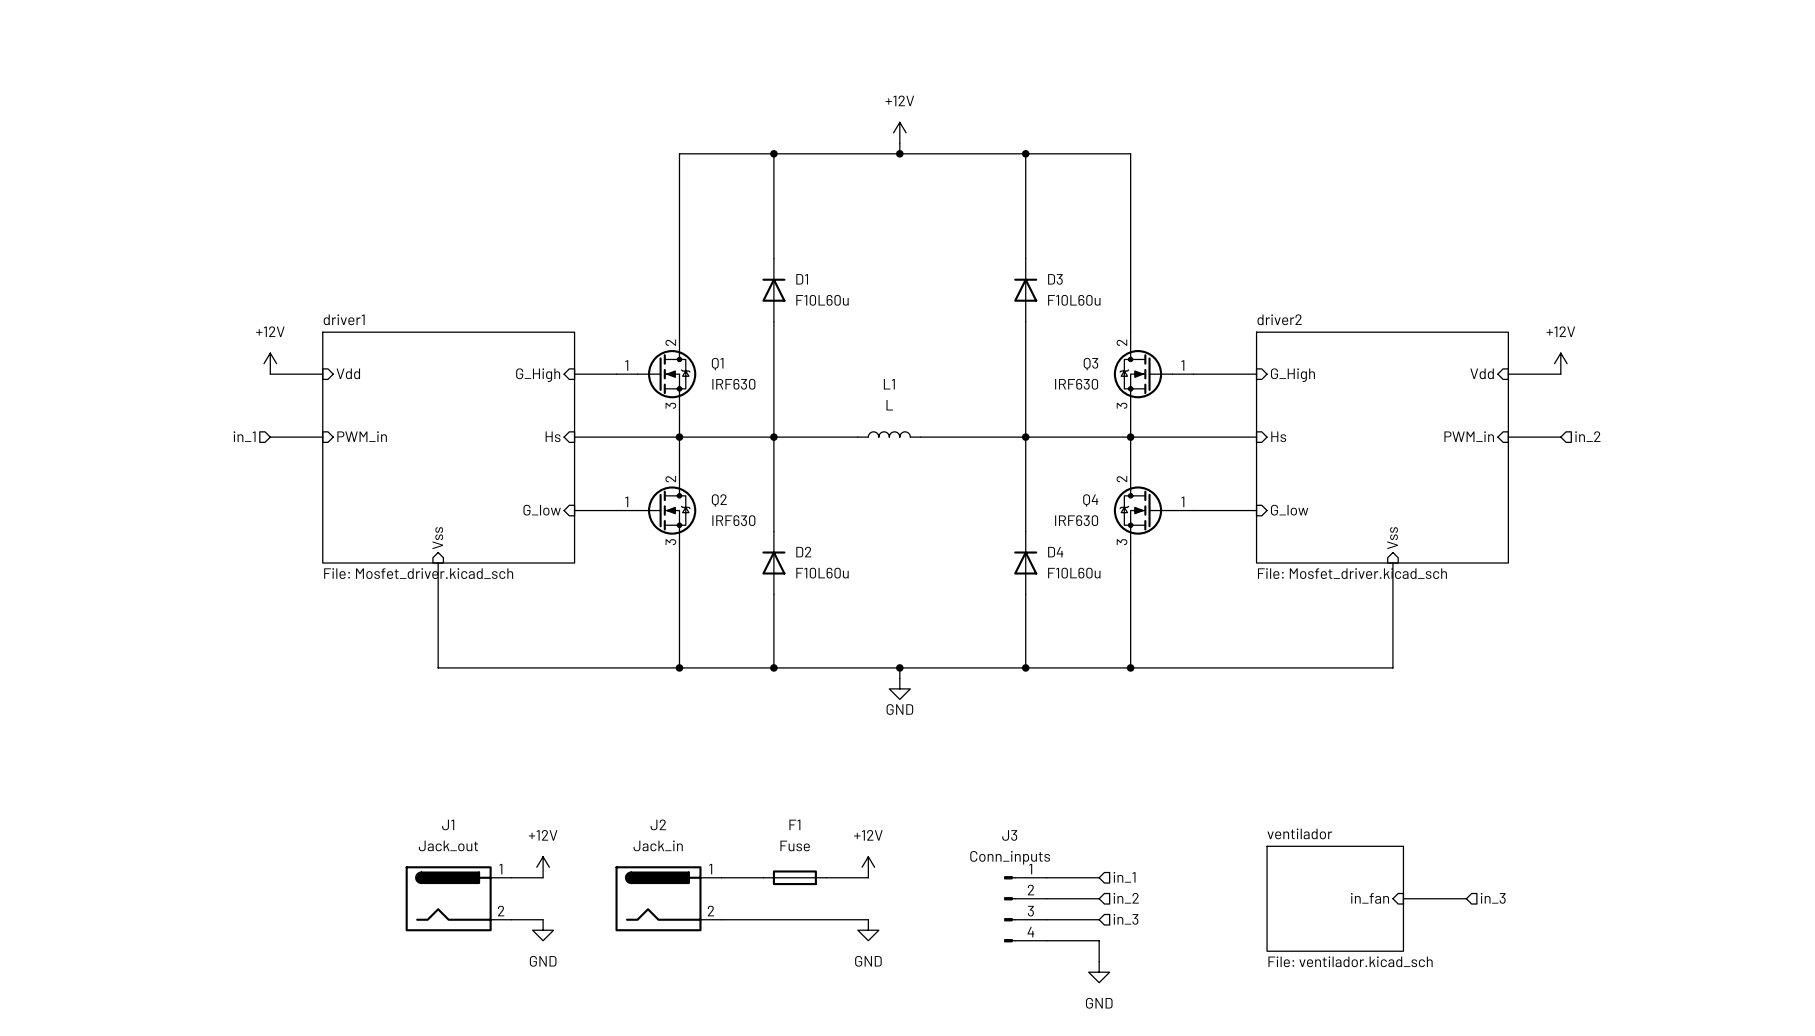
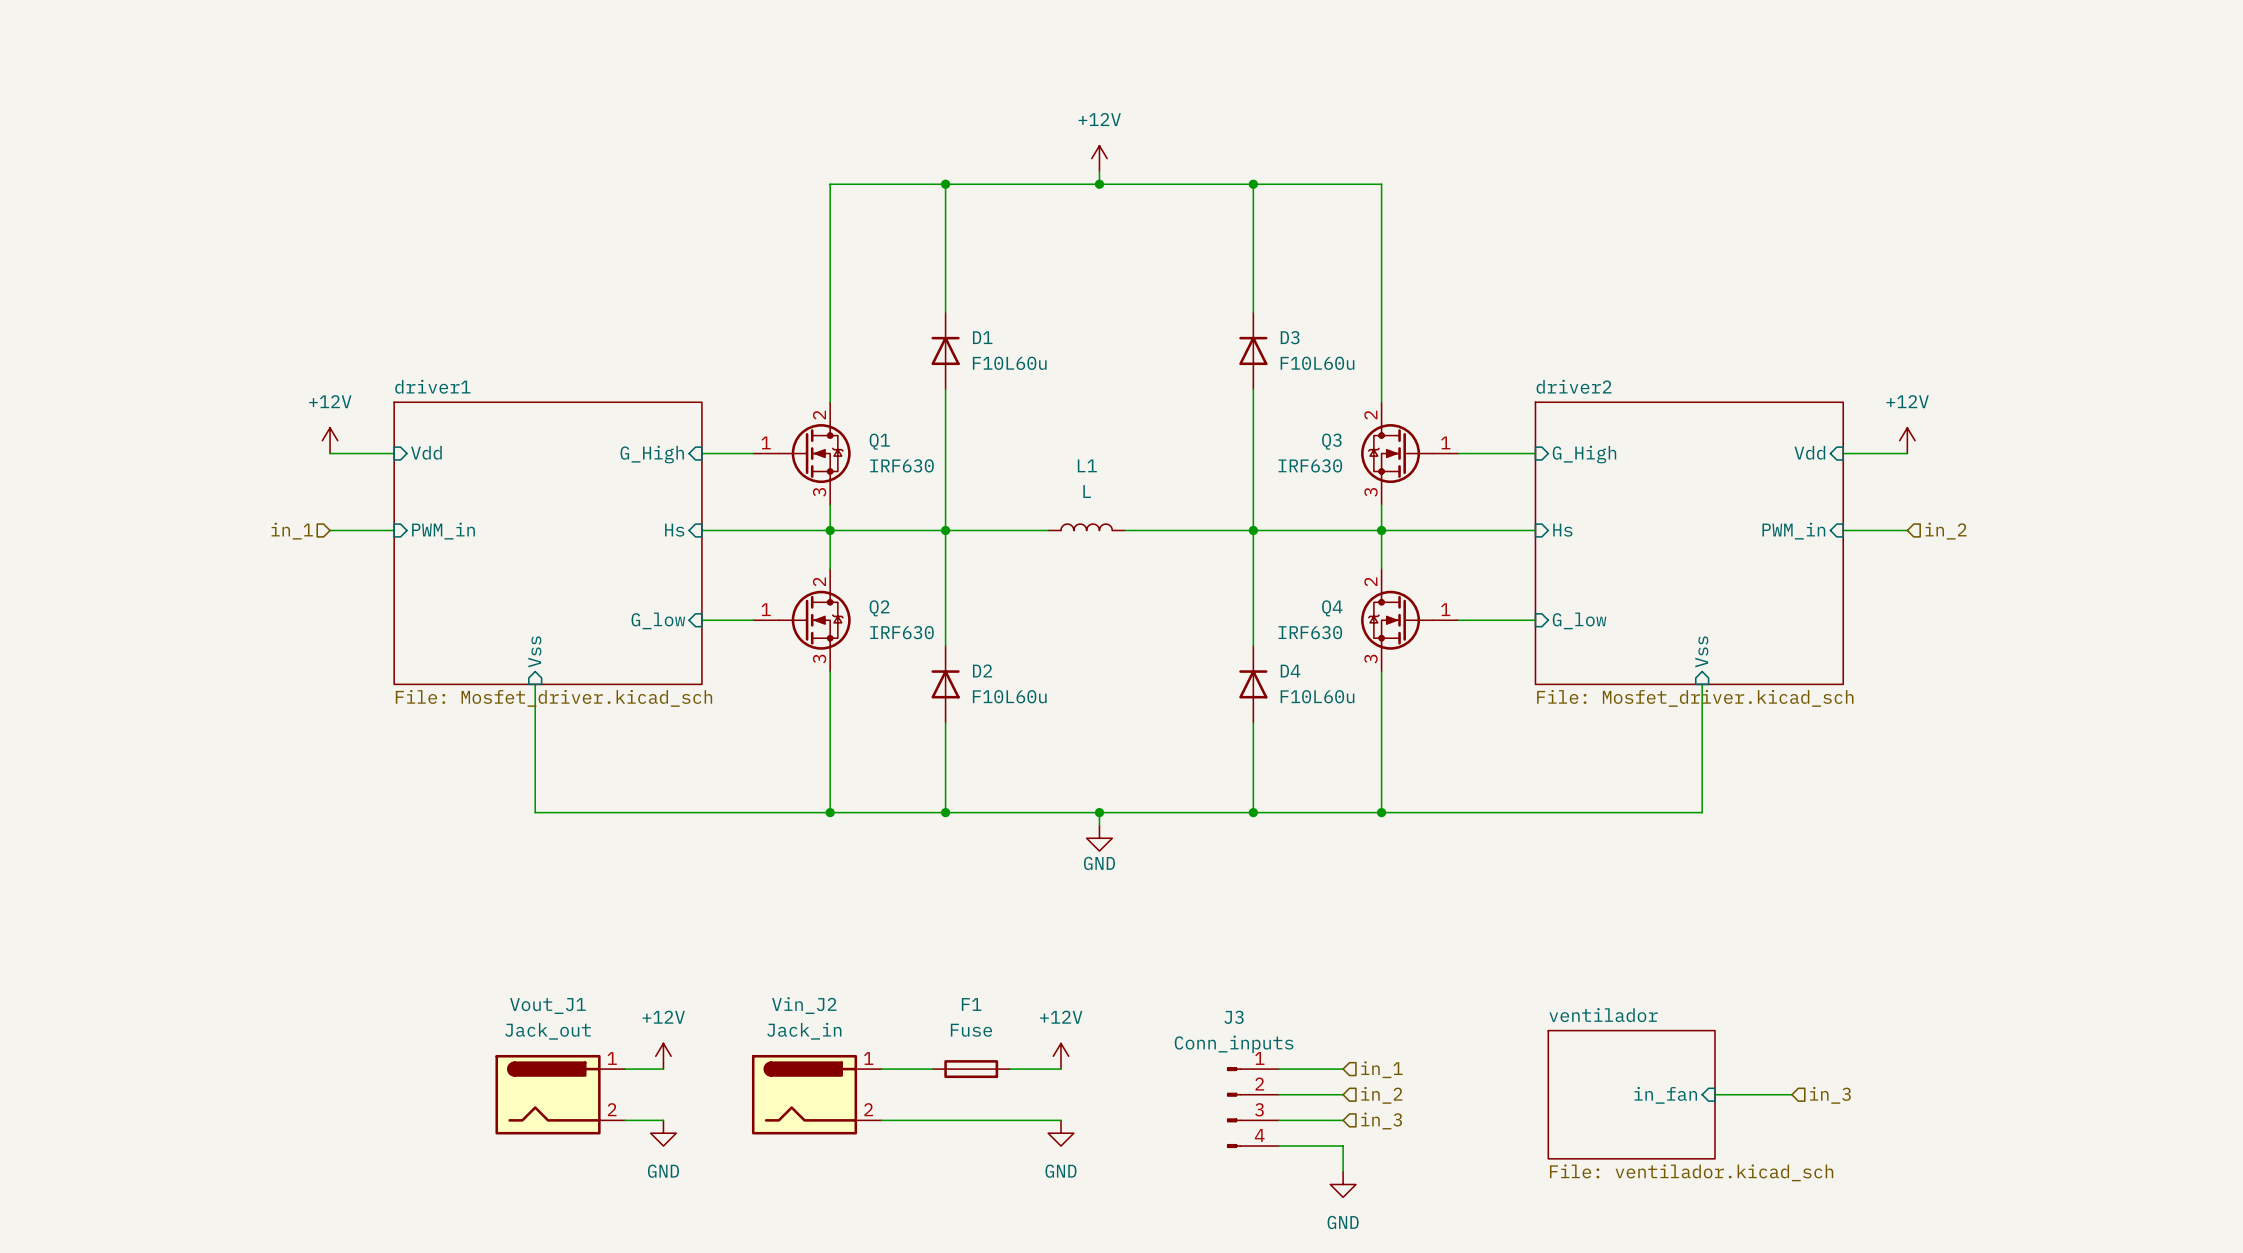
J1 name: J1 (448, 824) -> Vout_J1 (547, 1006)
J2 name: J2 (658, 824) -> Vin_J2 (804, 1005)

